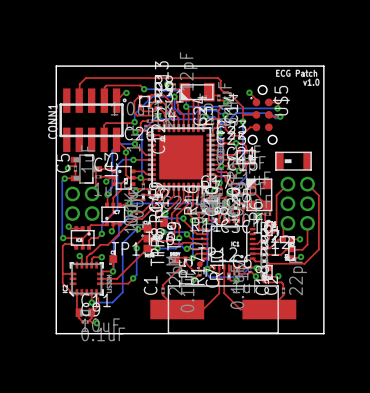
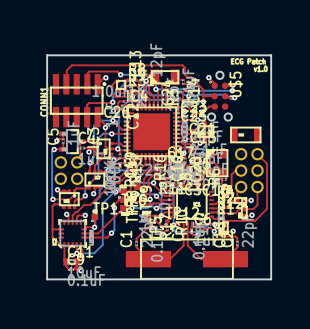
top track: (287, 184) (276, 195) (276, 208) -> (241, 170) (235, 170) (231, 174)

